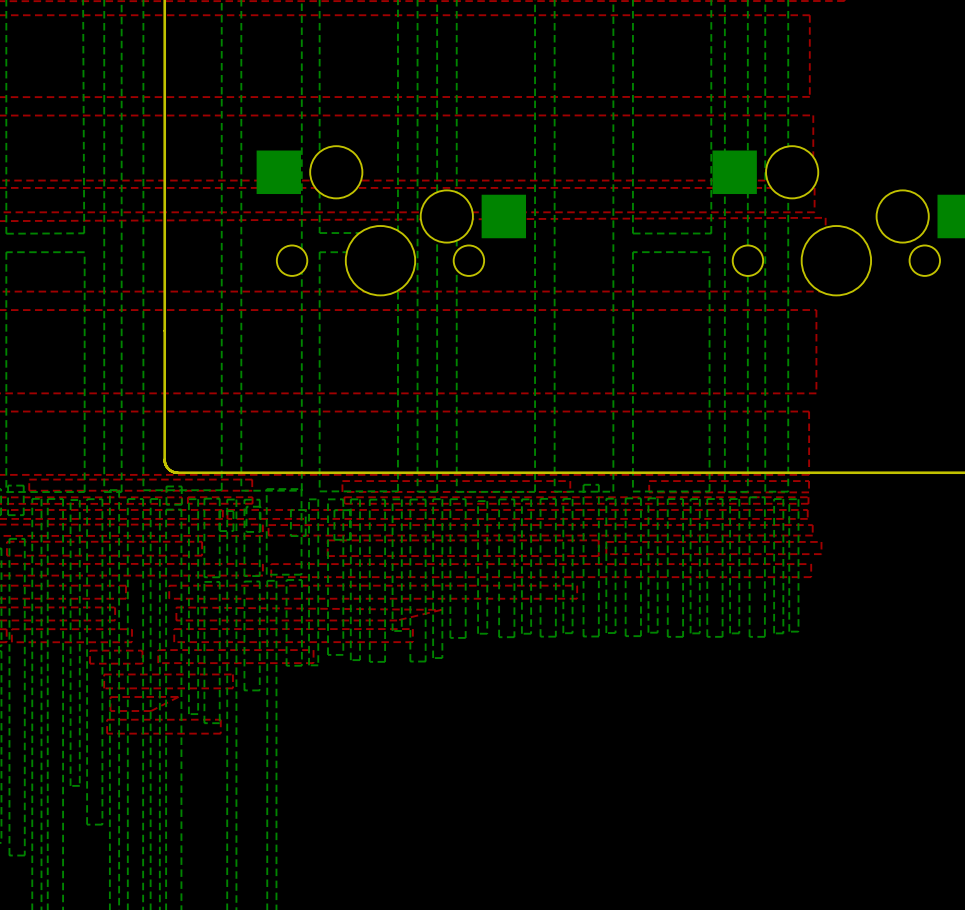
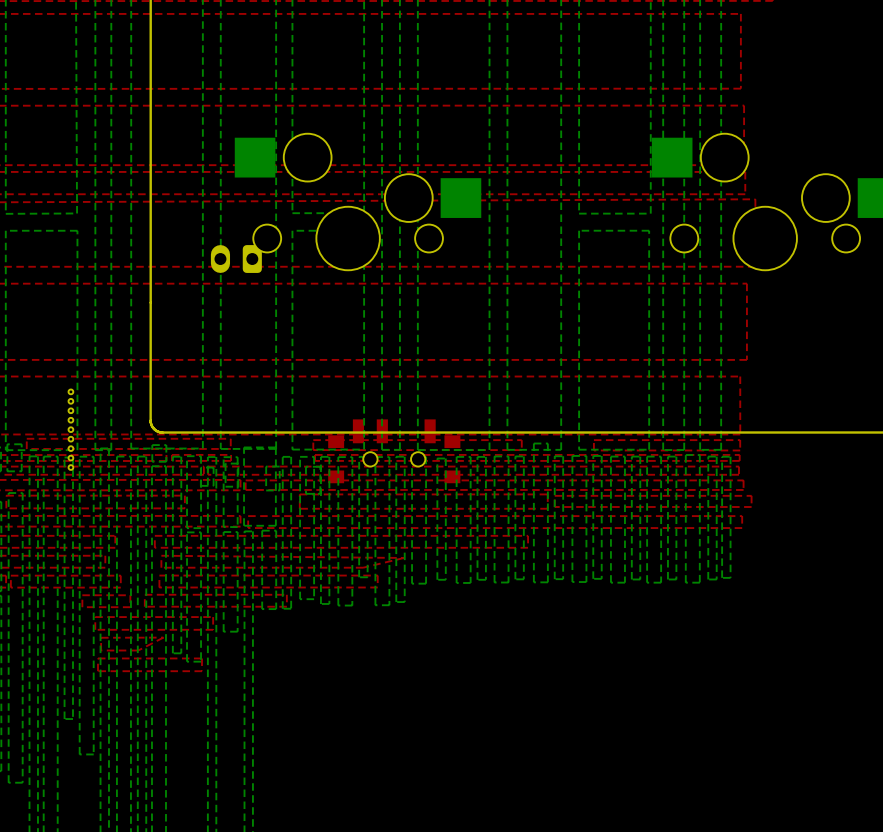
part: none -> (236, 259)
part: none -> (70, 429)
part: none -> (394, 451)

